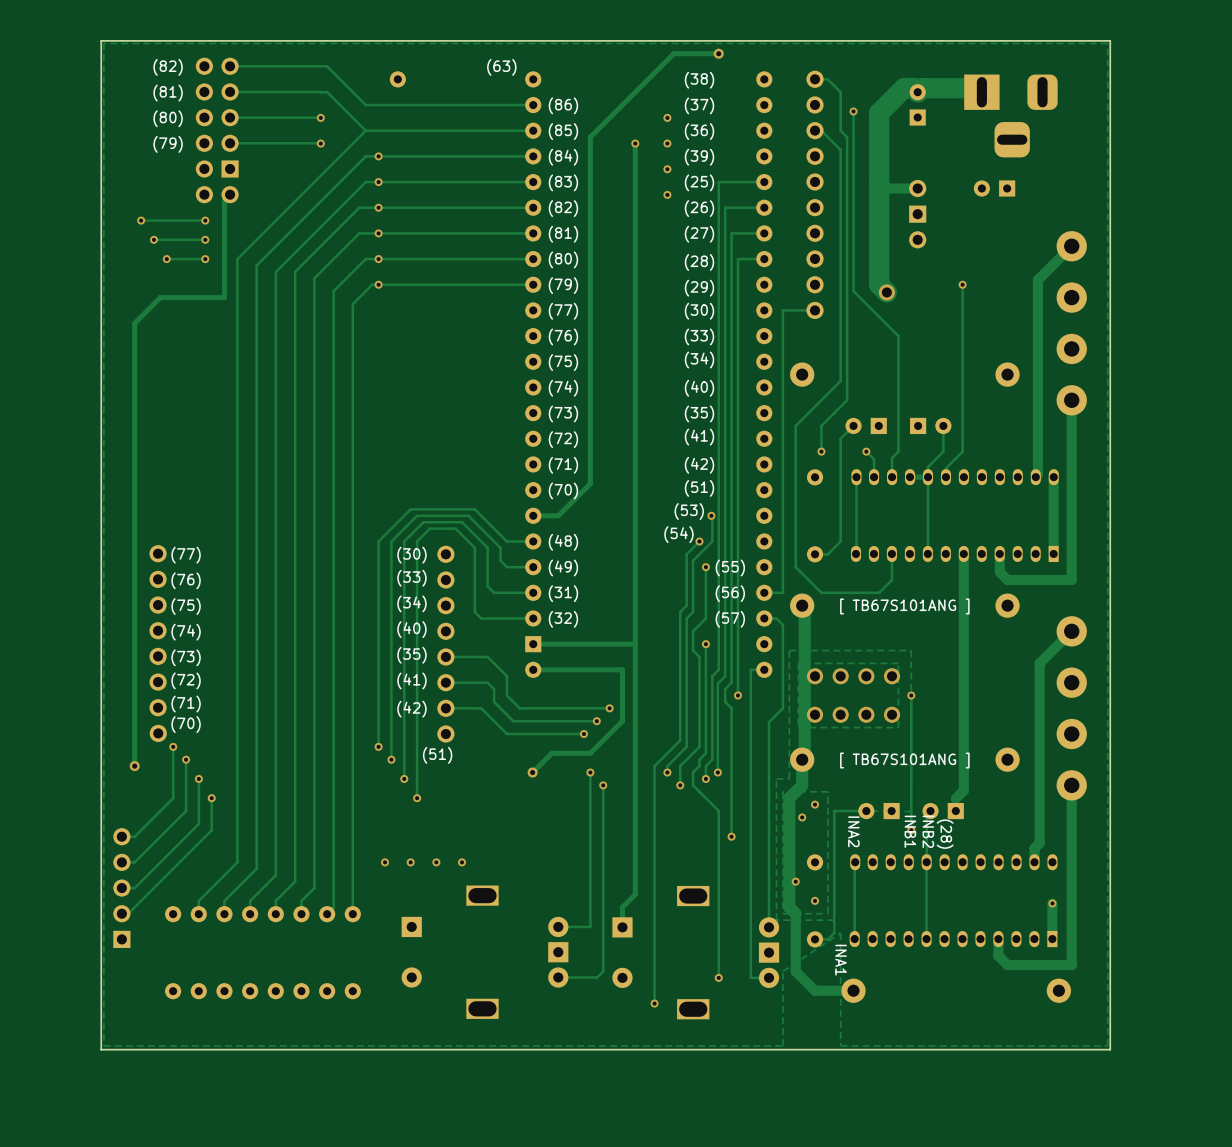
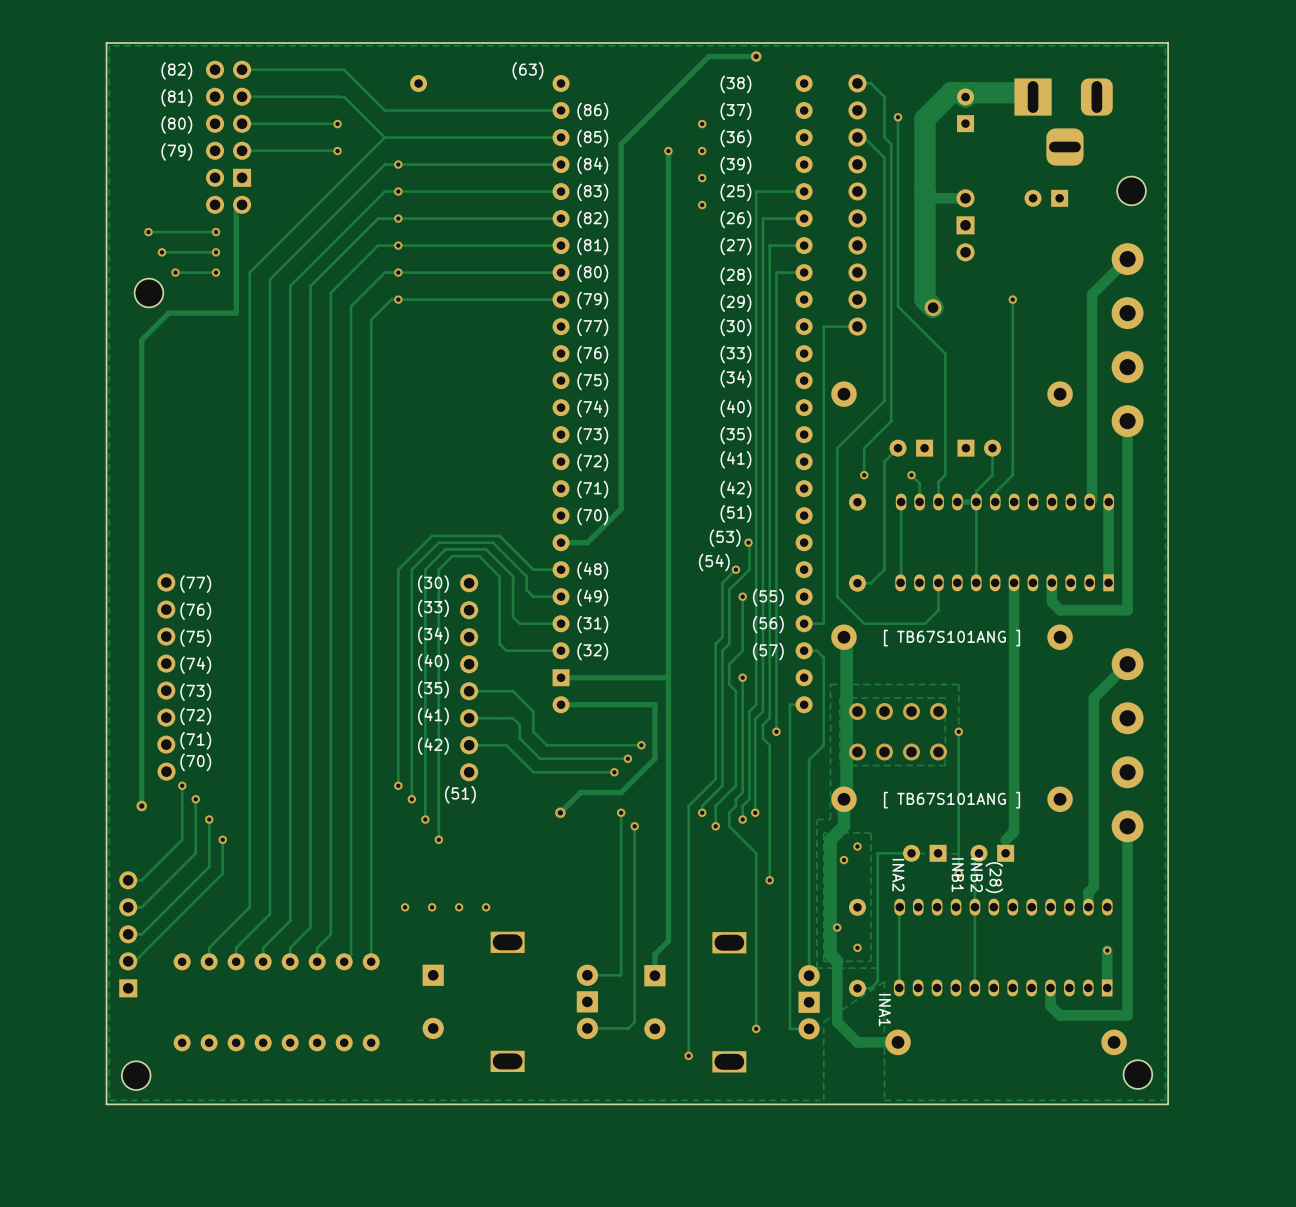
part: none -> (1131, 190)
part: none -> (148, 293)
part: none -> (1137, 1074)
part: none -> (136, 1075)

